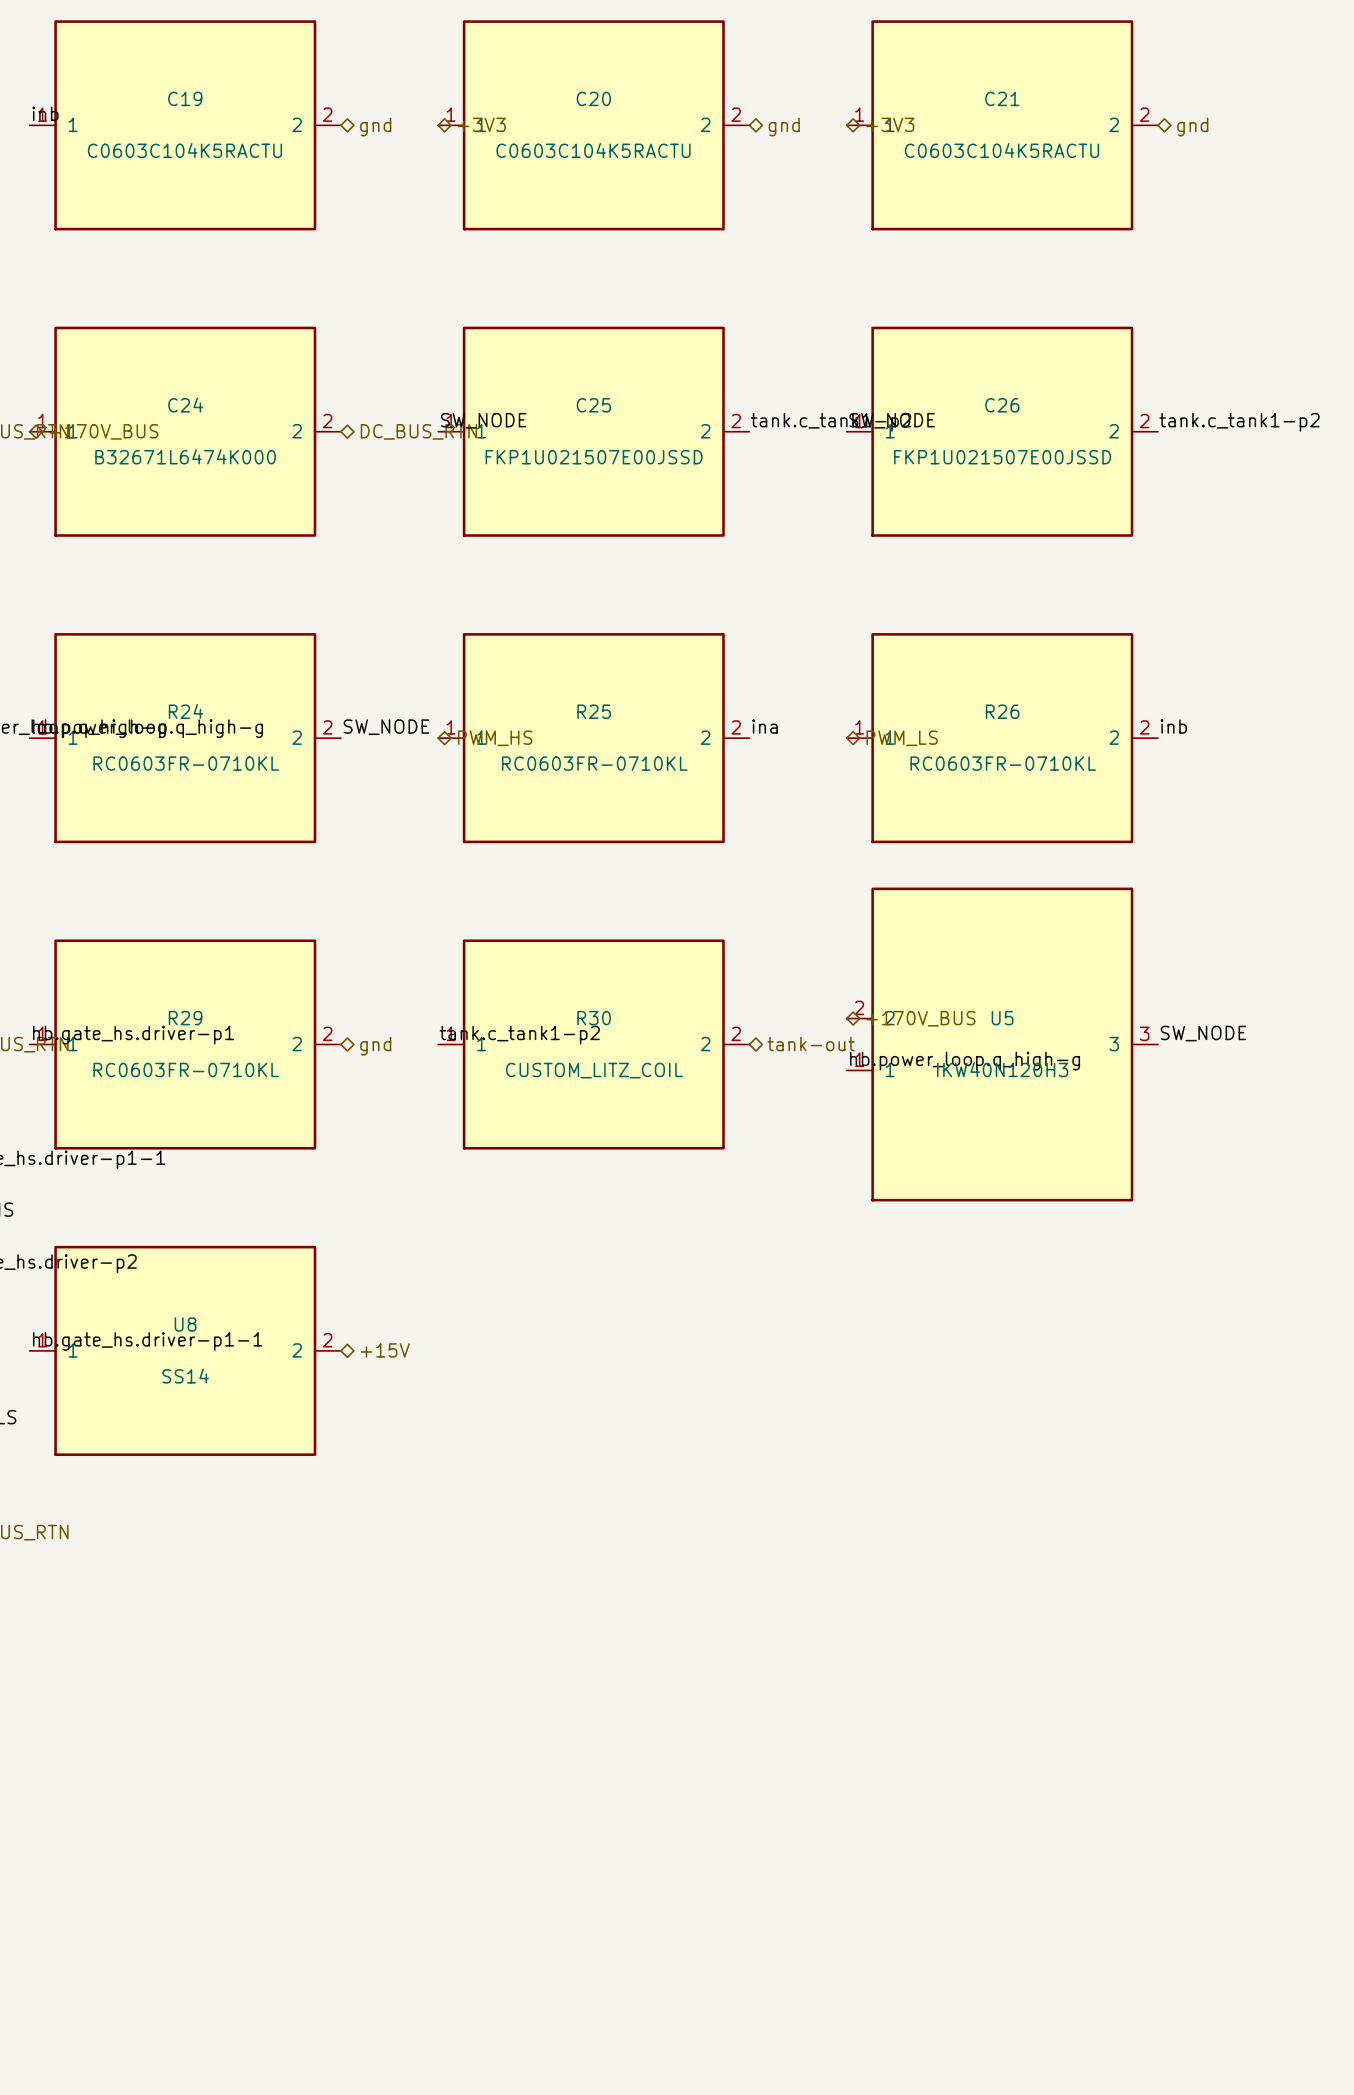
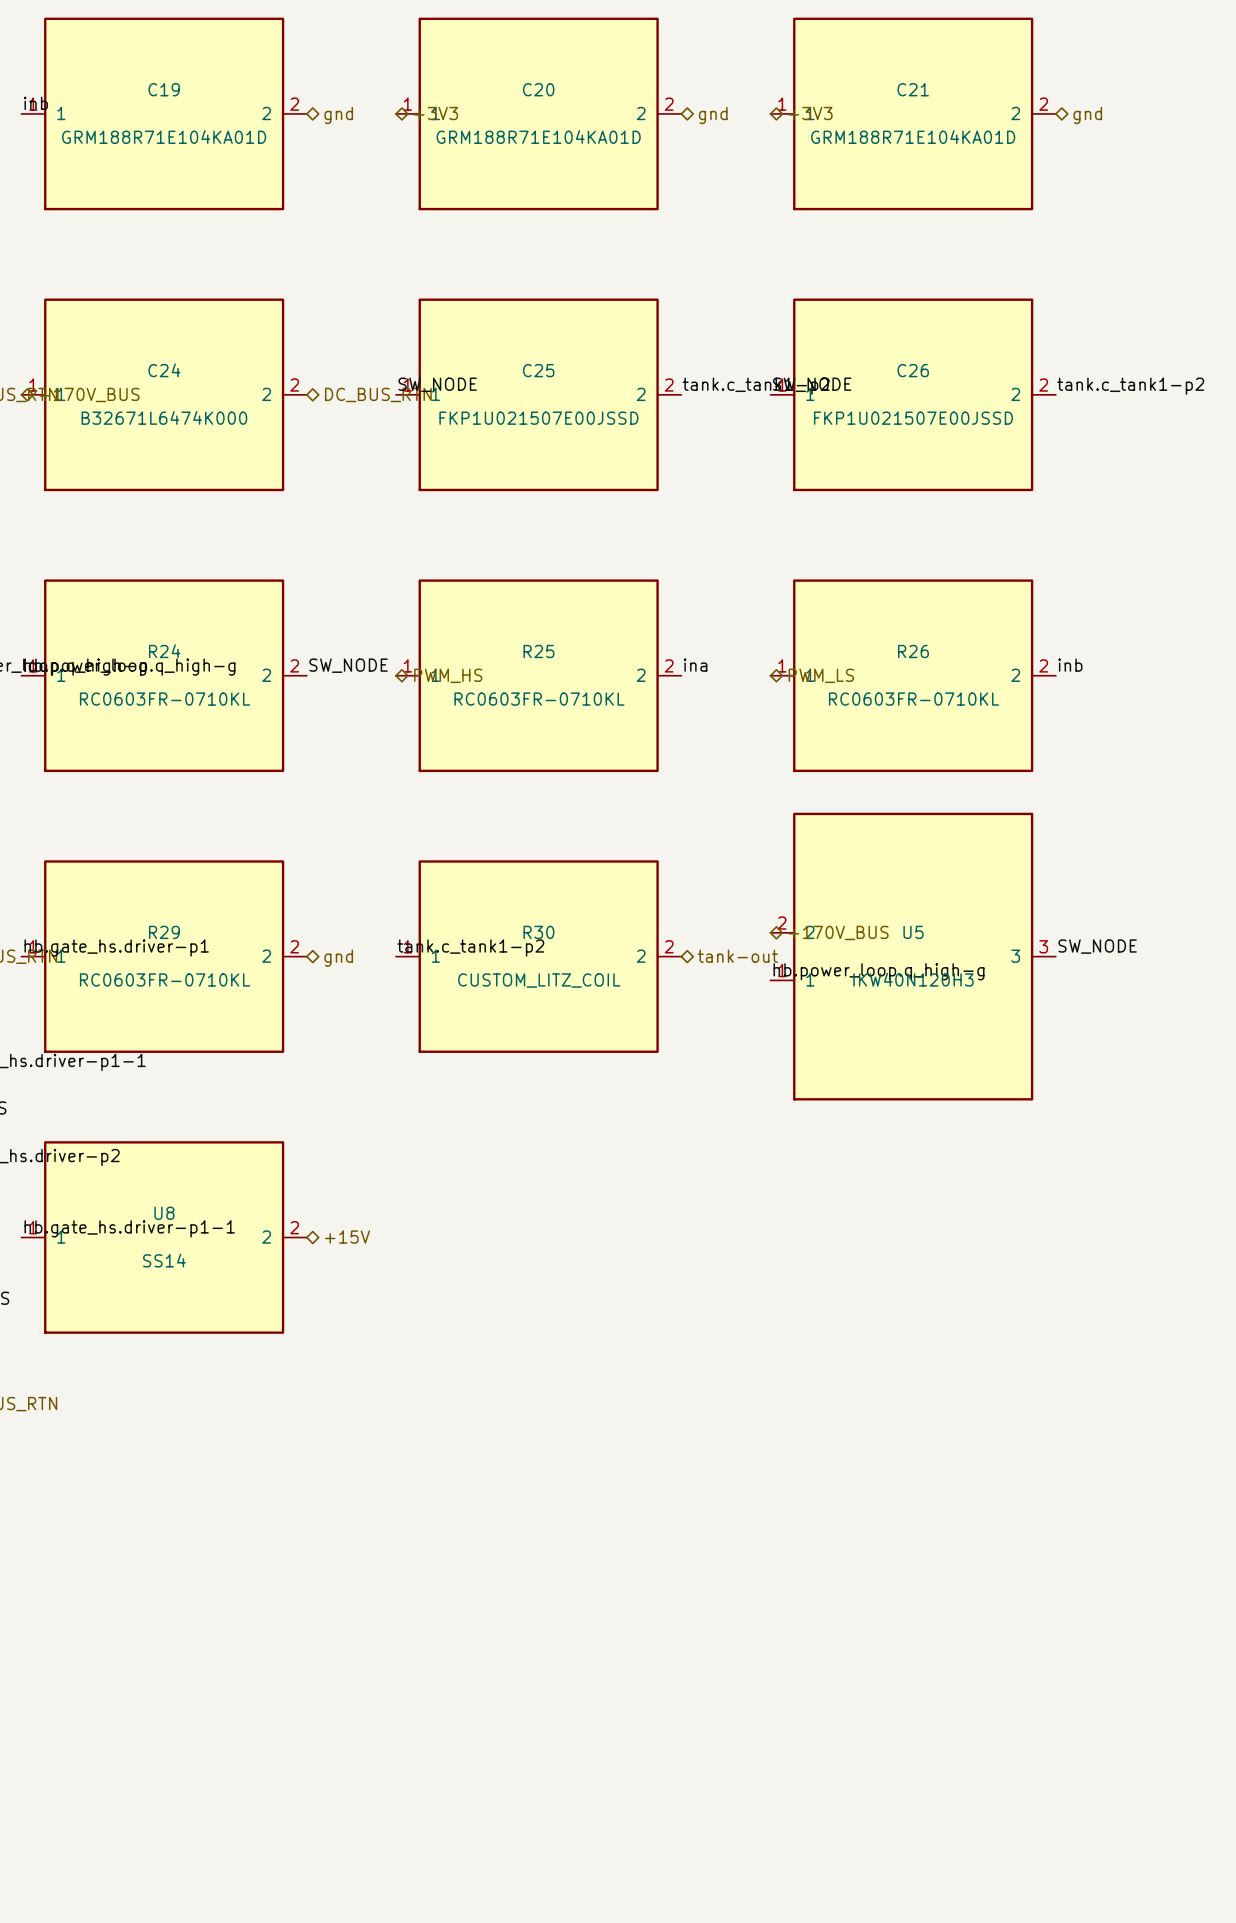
C19 value: C0603C104K5RACTU (184, 150) -> GRM188R71E104KA01D (164, 137)
C20 value: C0603C104K5RACTU (593, 150) -> GRM188R71E104KA01D (538, 137)
C21 value: C0603C104K5RACTU (1002, 150) -> GRM188R71E104KA01D (913, 137)

